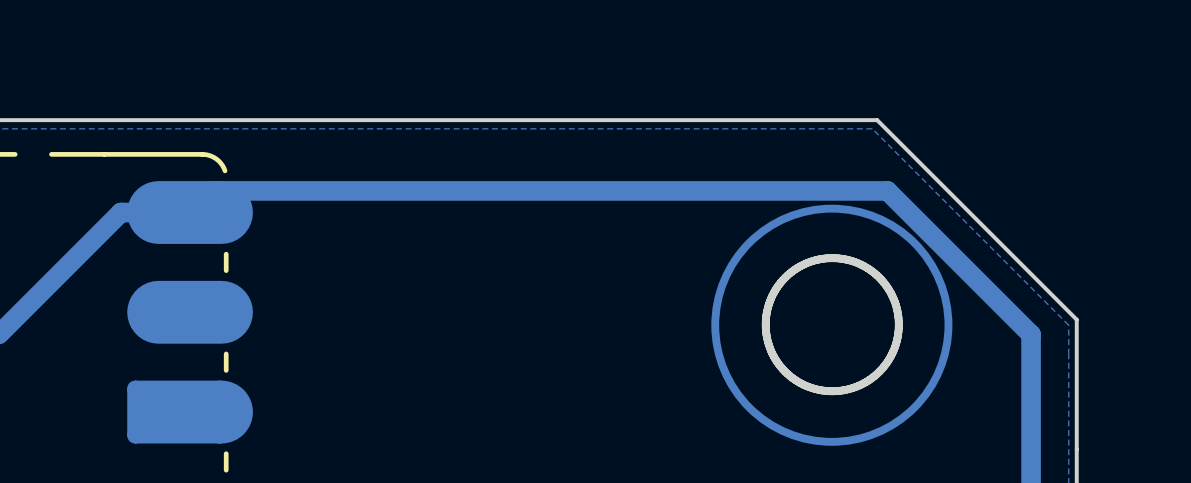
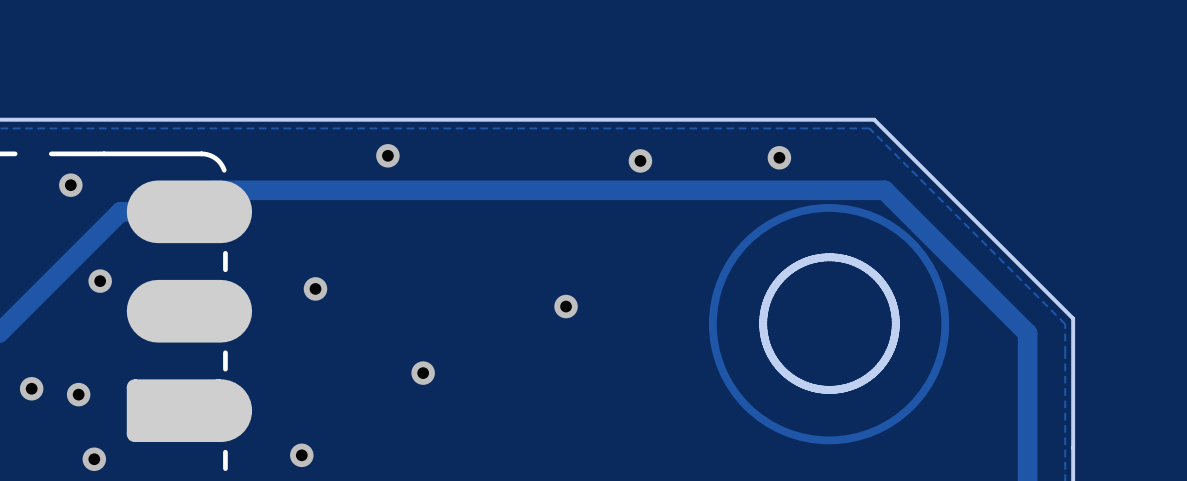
via: none -> (387, 155)
via: none -> (779, 157)
via: none -> (640, 160)
via: none -> (70, 185)
via: none -> (100, 281)
via: none -> (315, 288)
via: none -> (566, 306)
via: none -> (423, 373)
via: none -> (31, 388)
via: none -> (78, 394)
via: none -> (301, 455)
via: none -> (94, 459)

